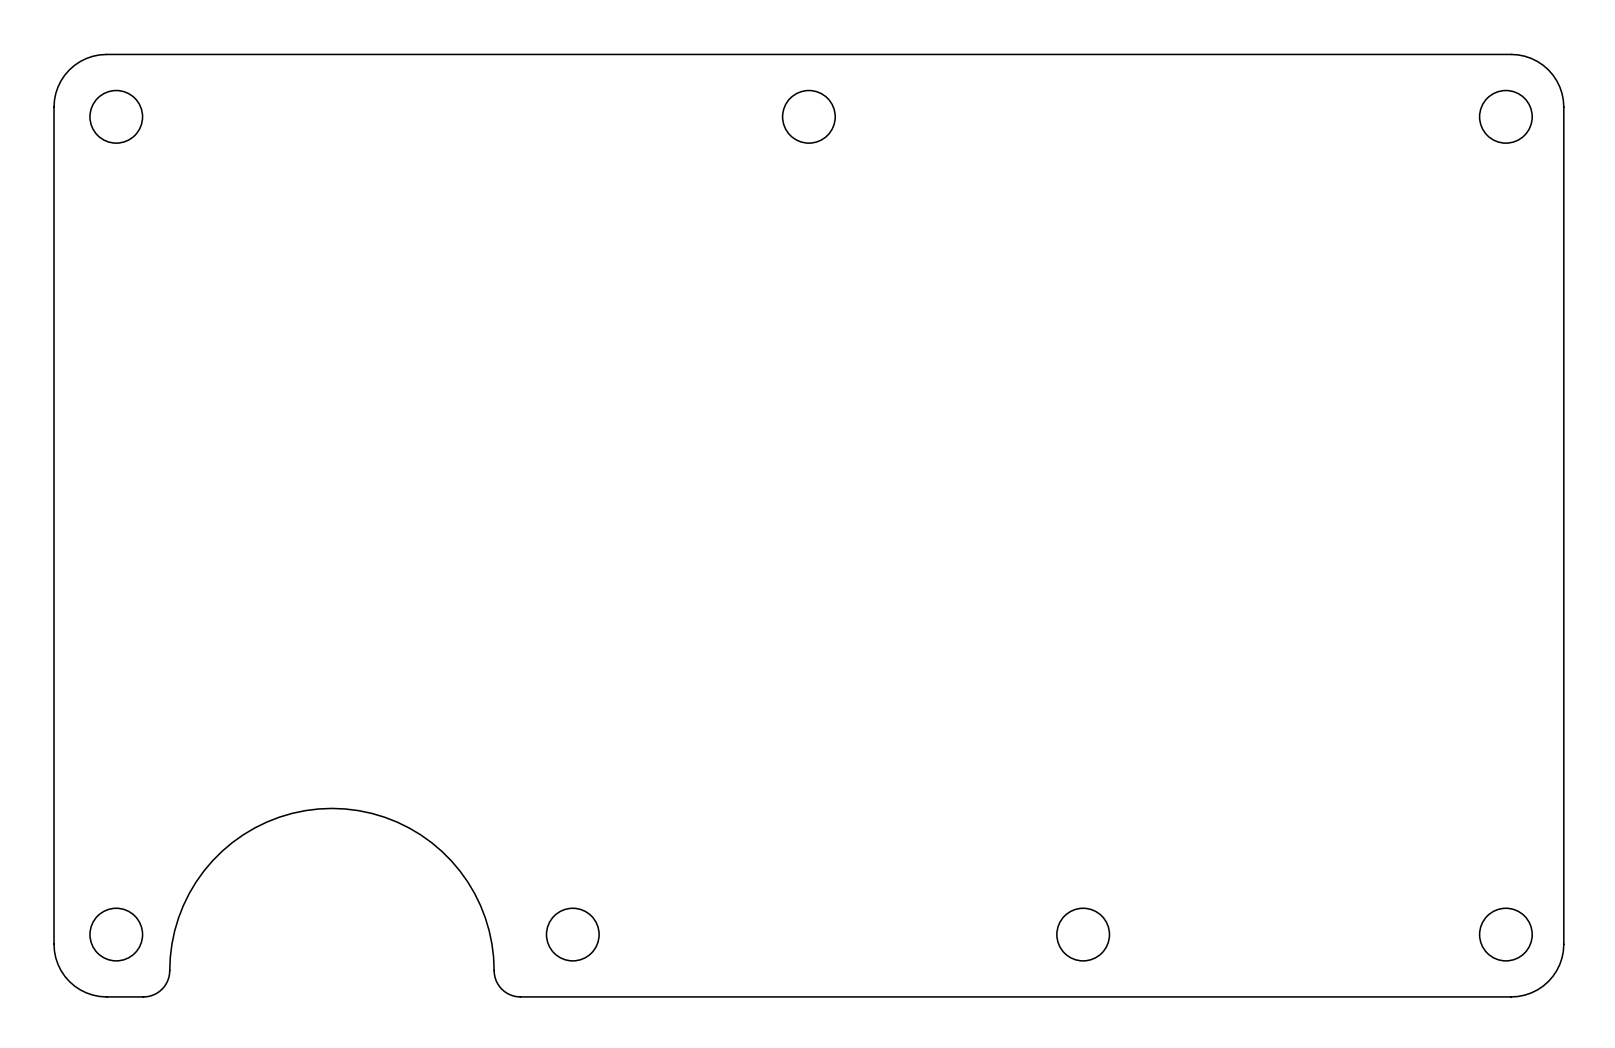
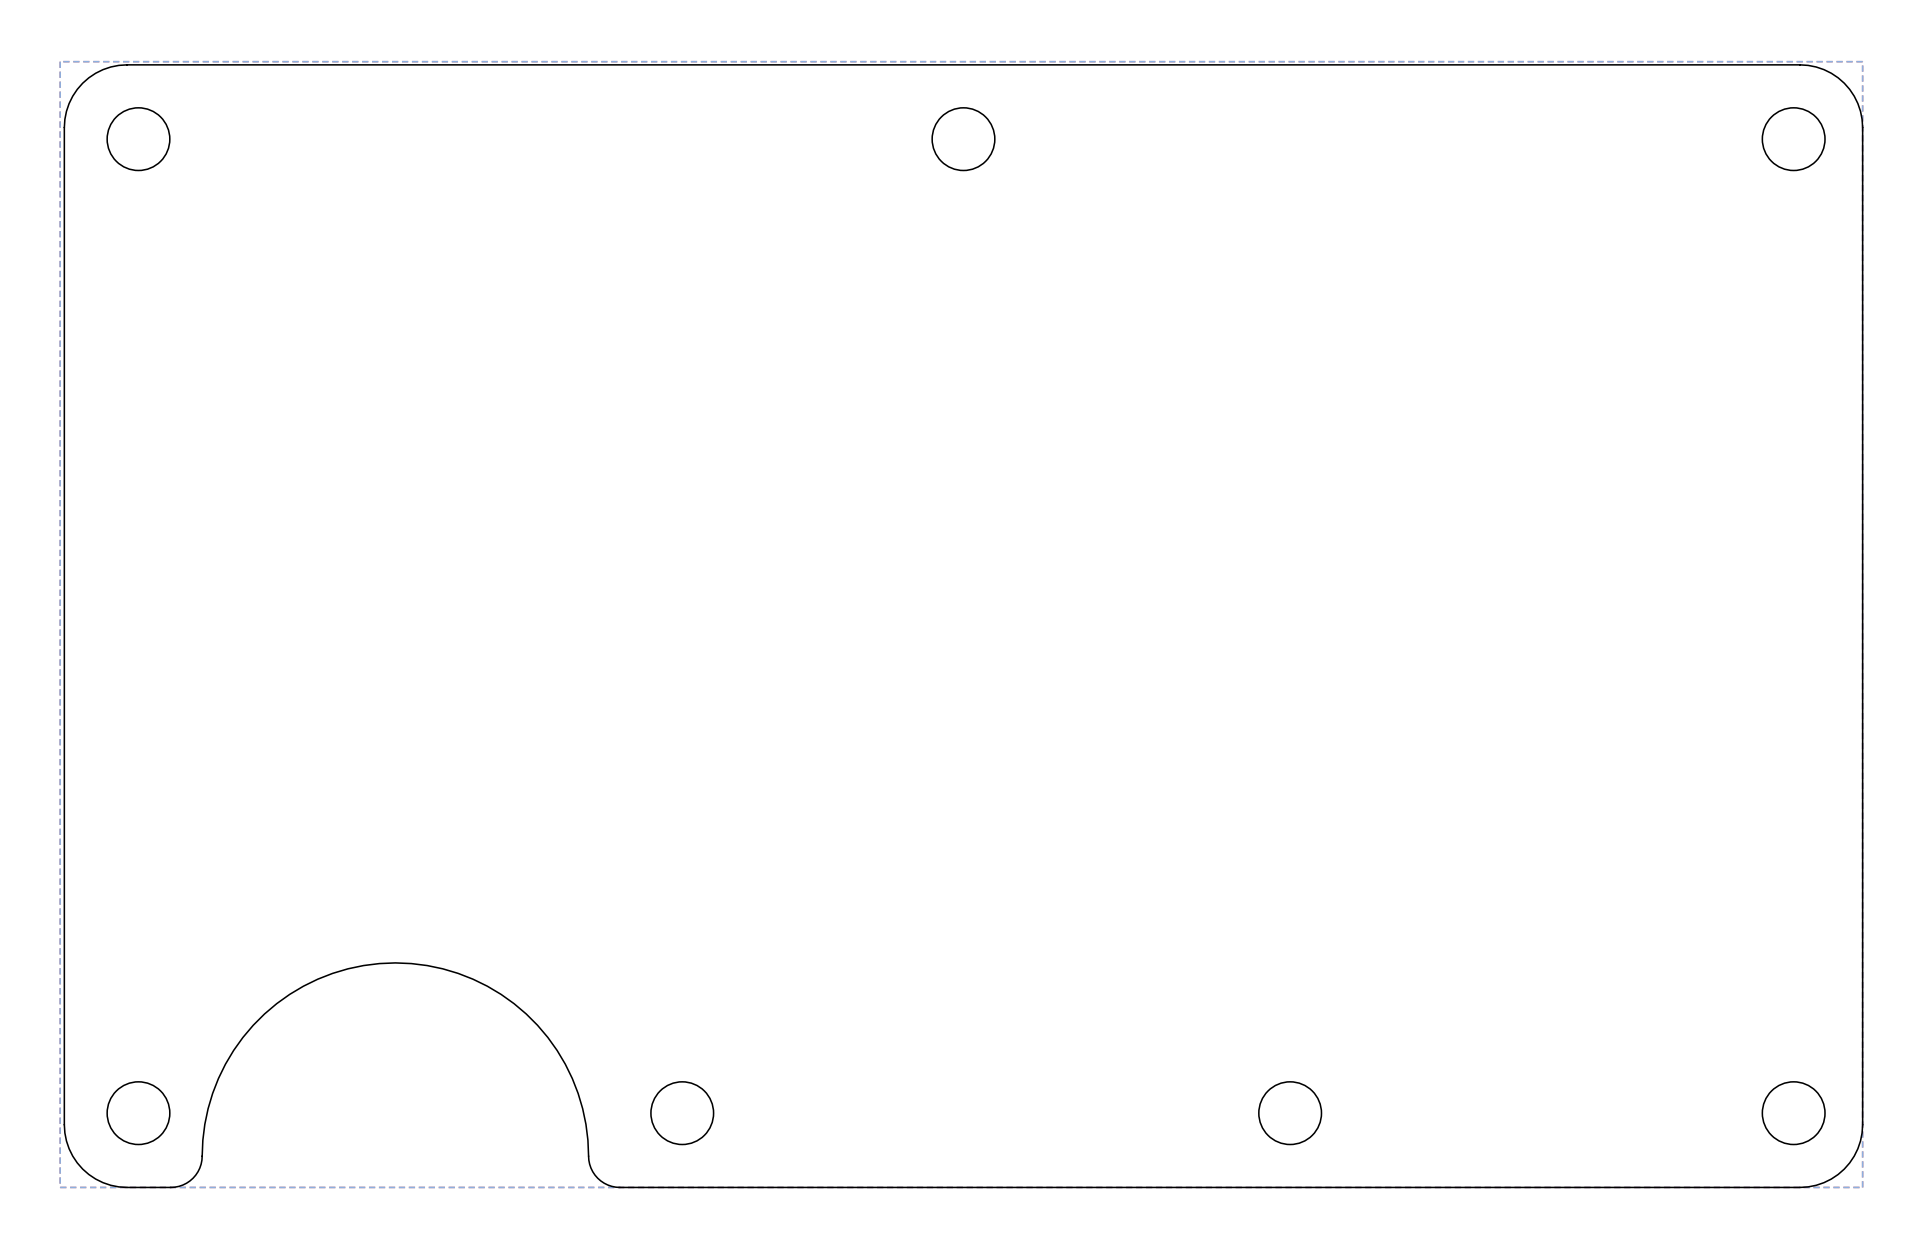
bottom zone outline: none -> (1862, 61) (1862, 1187) (60, 1187) (60, 61) (1862, 61)

